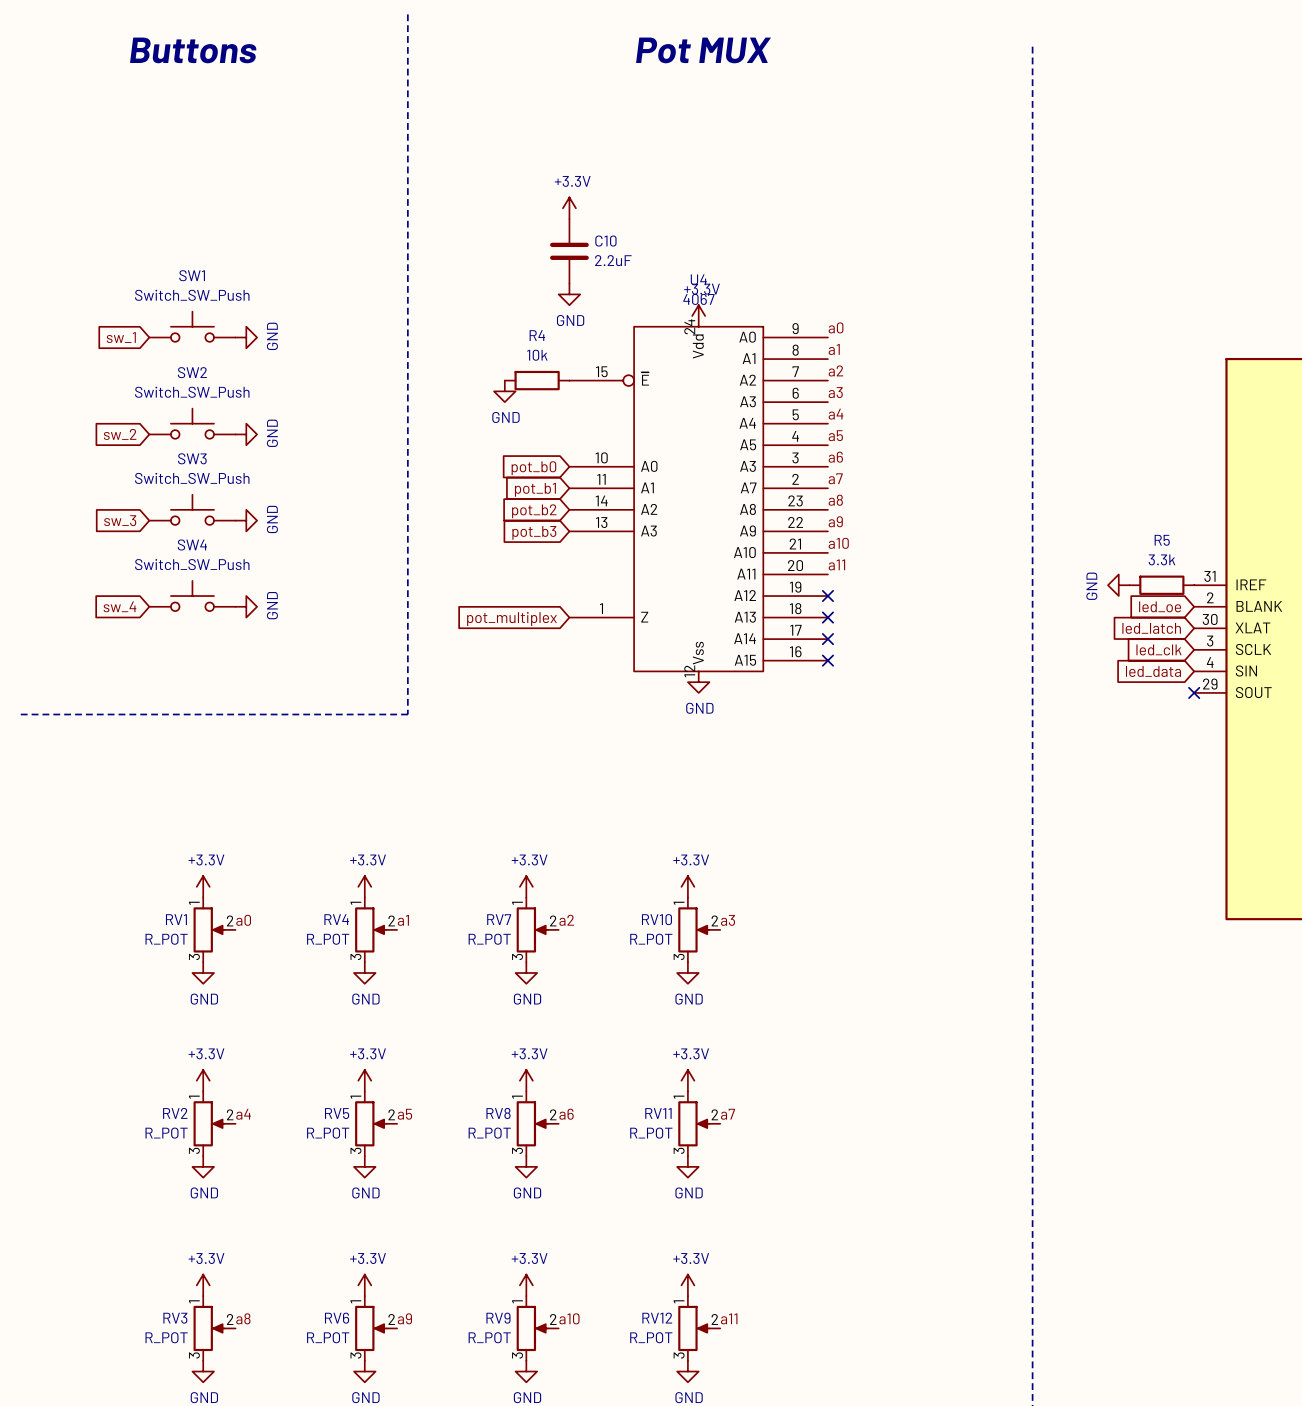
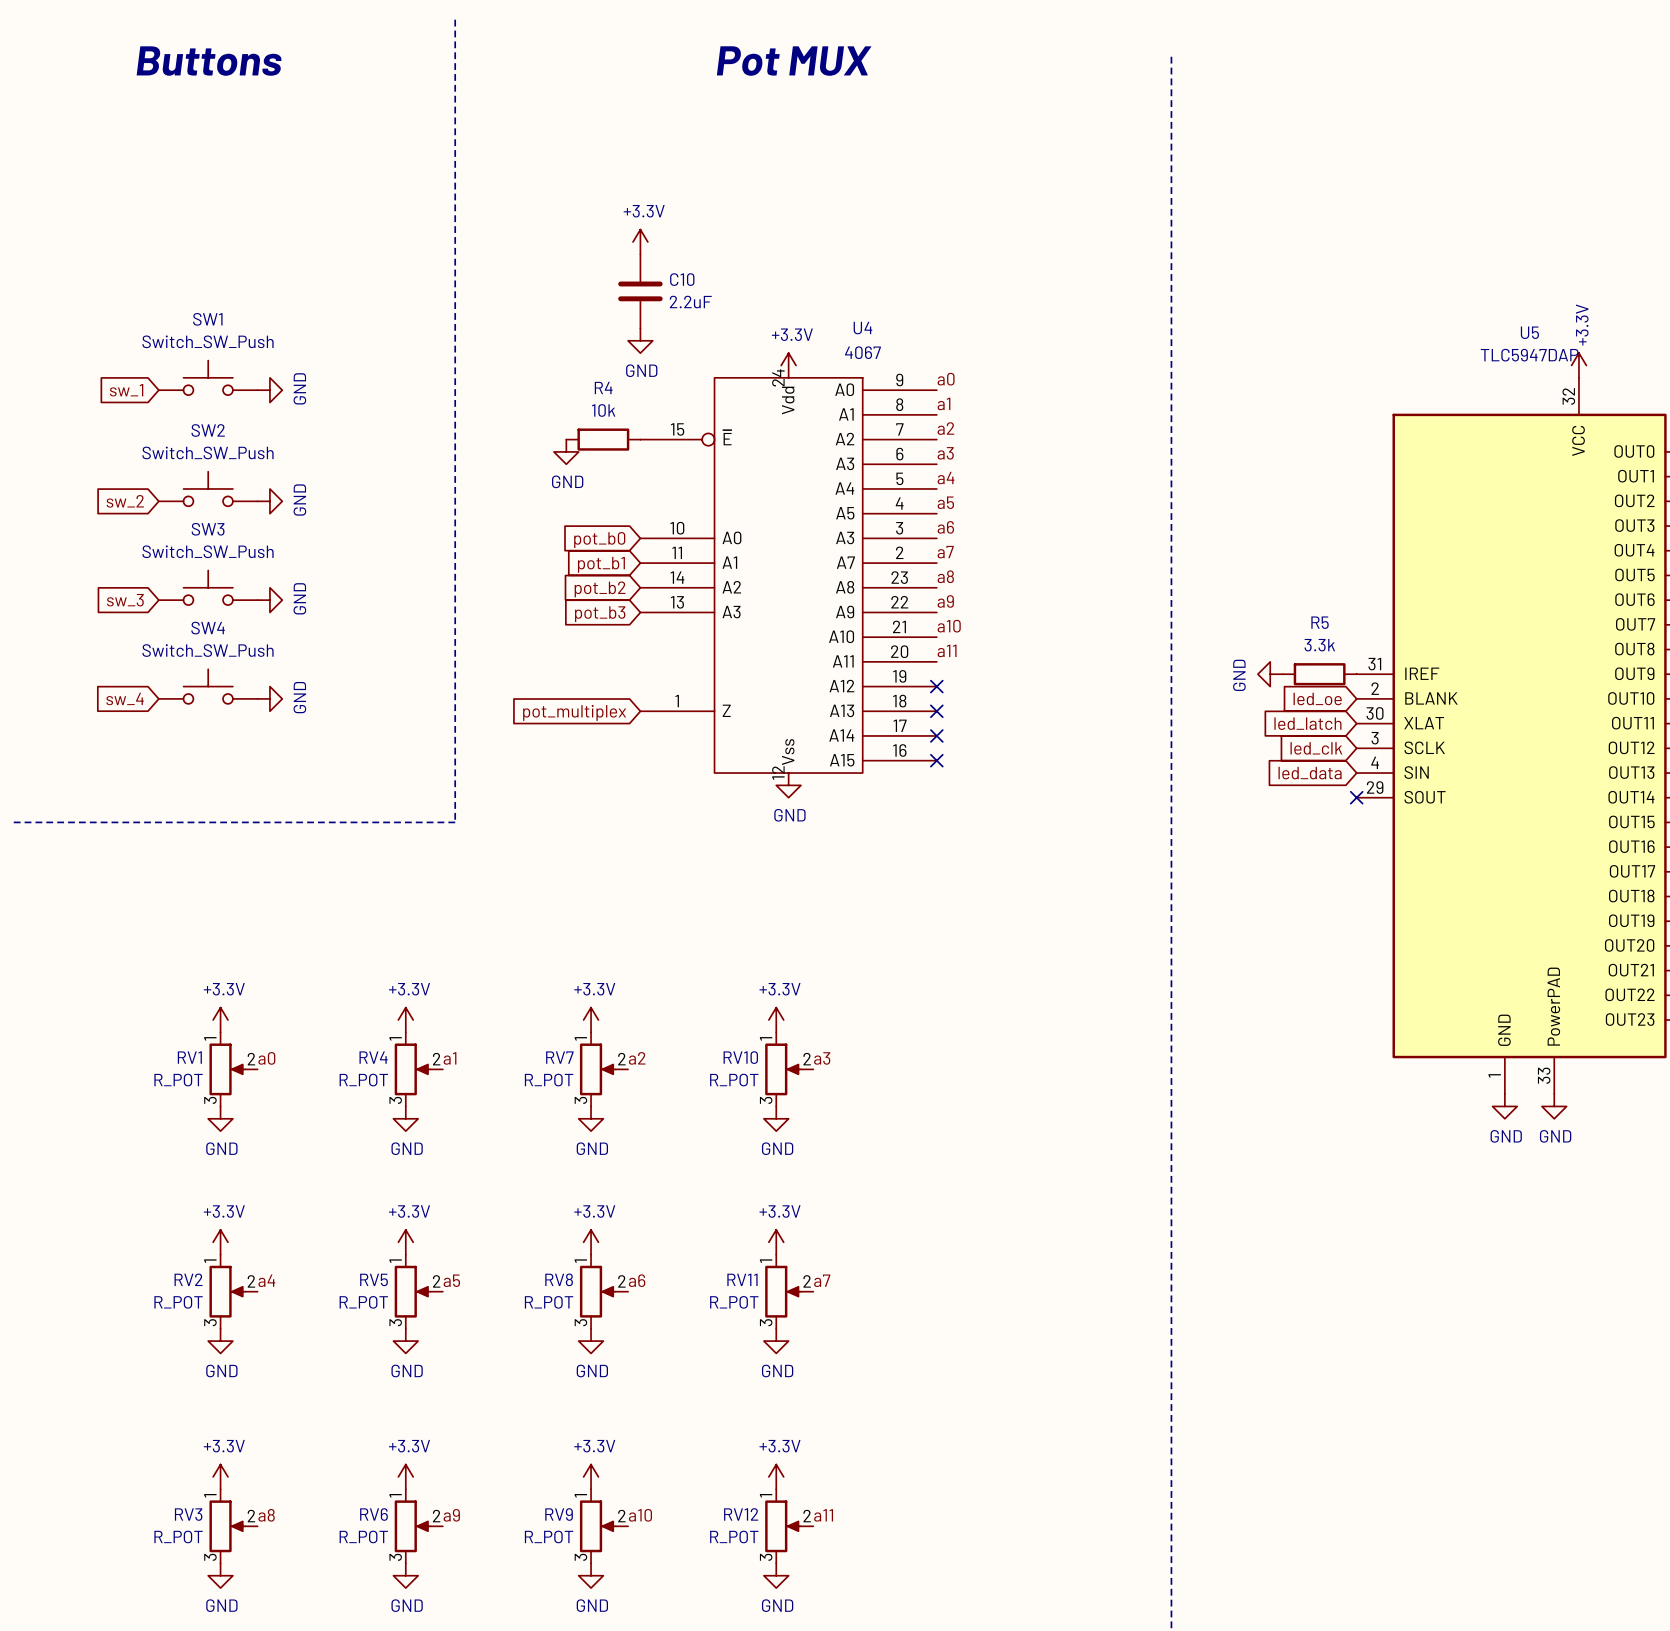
U4 name position: U4 (698, 279) -> U4 (862, 328)
U4 value position: 4067 (698, 299) -> 4067 (862, 352)

